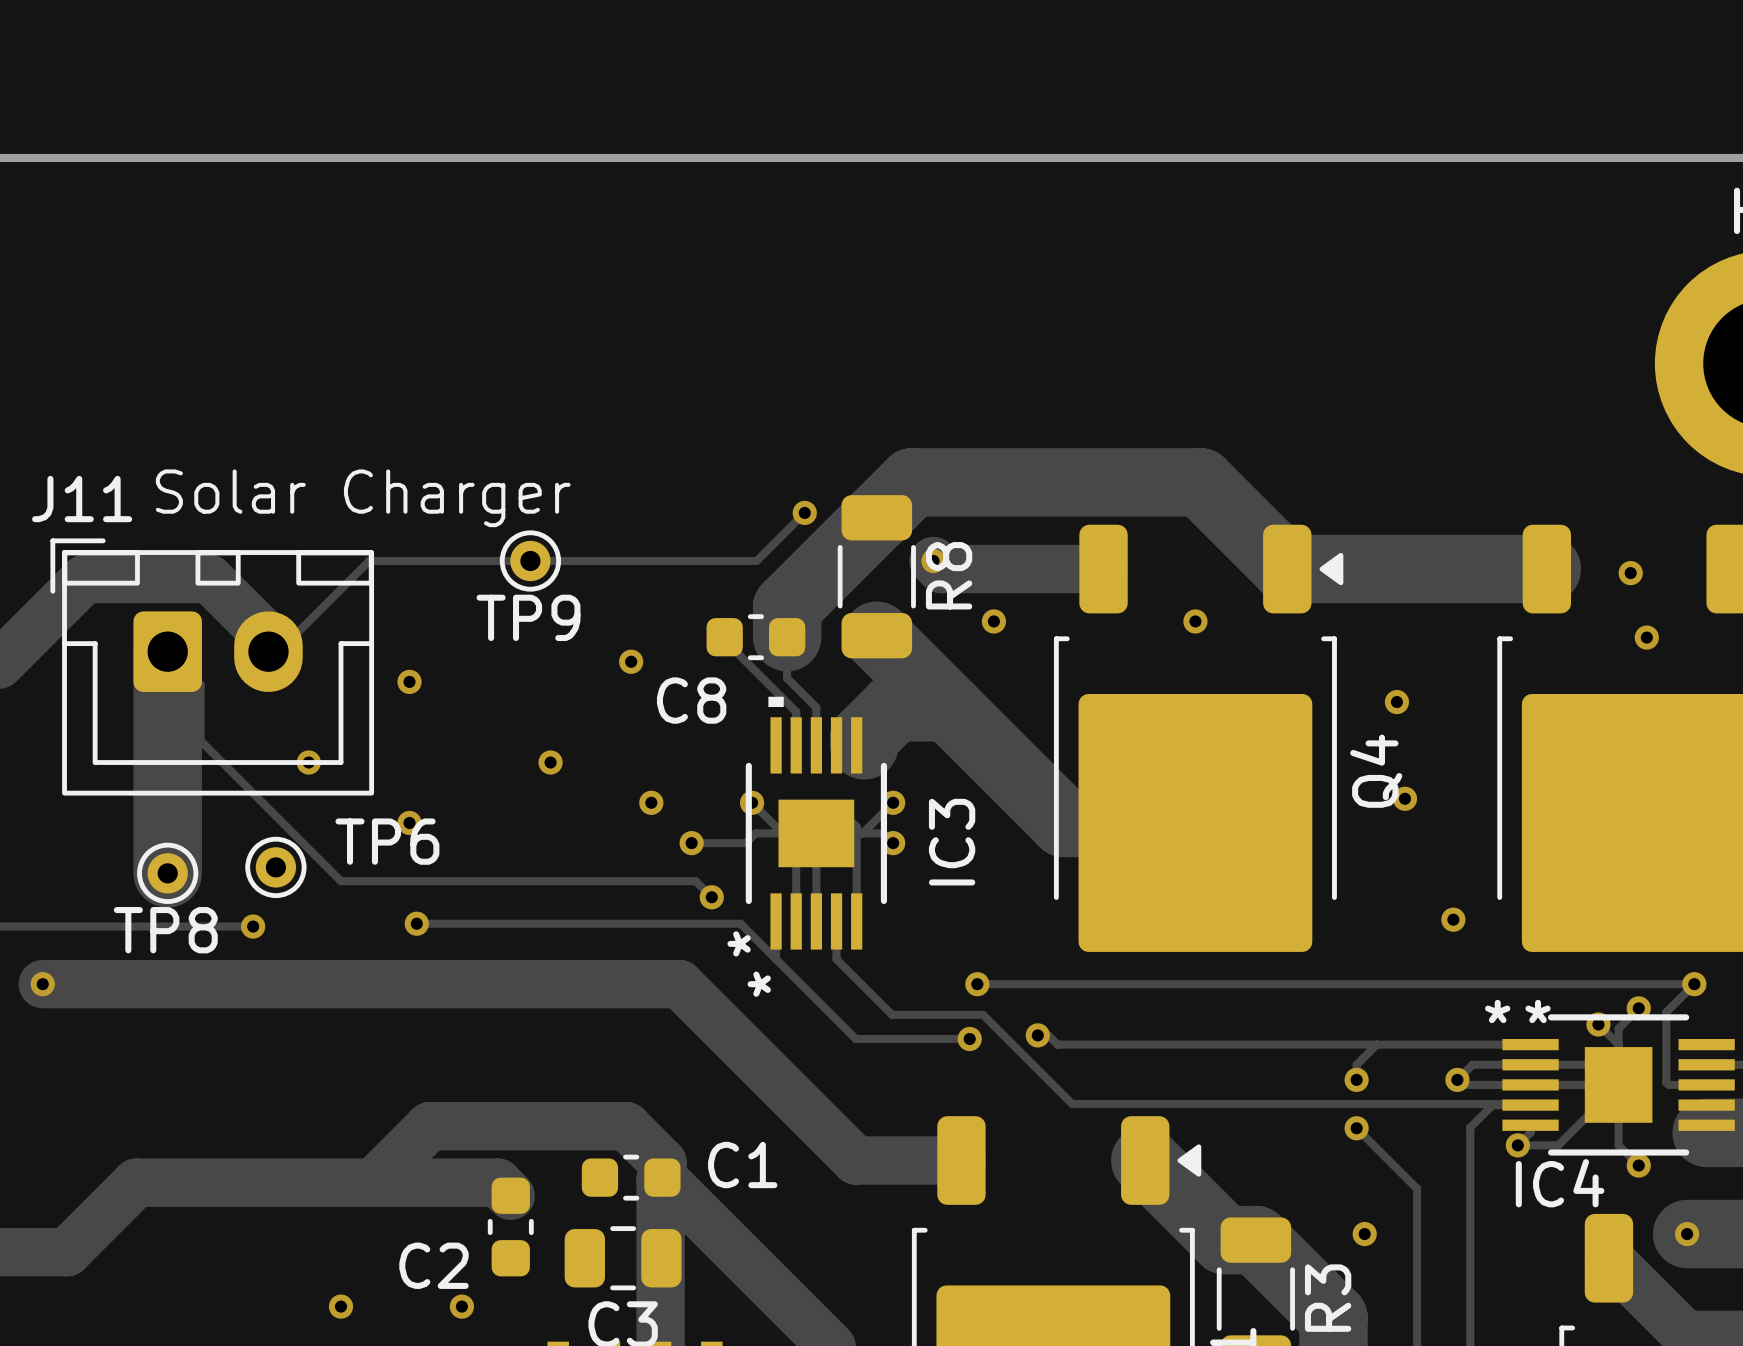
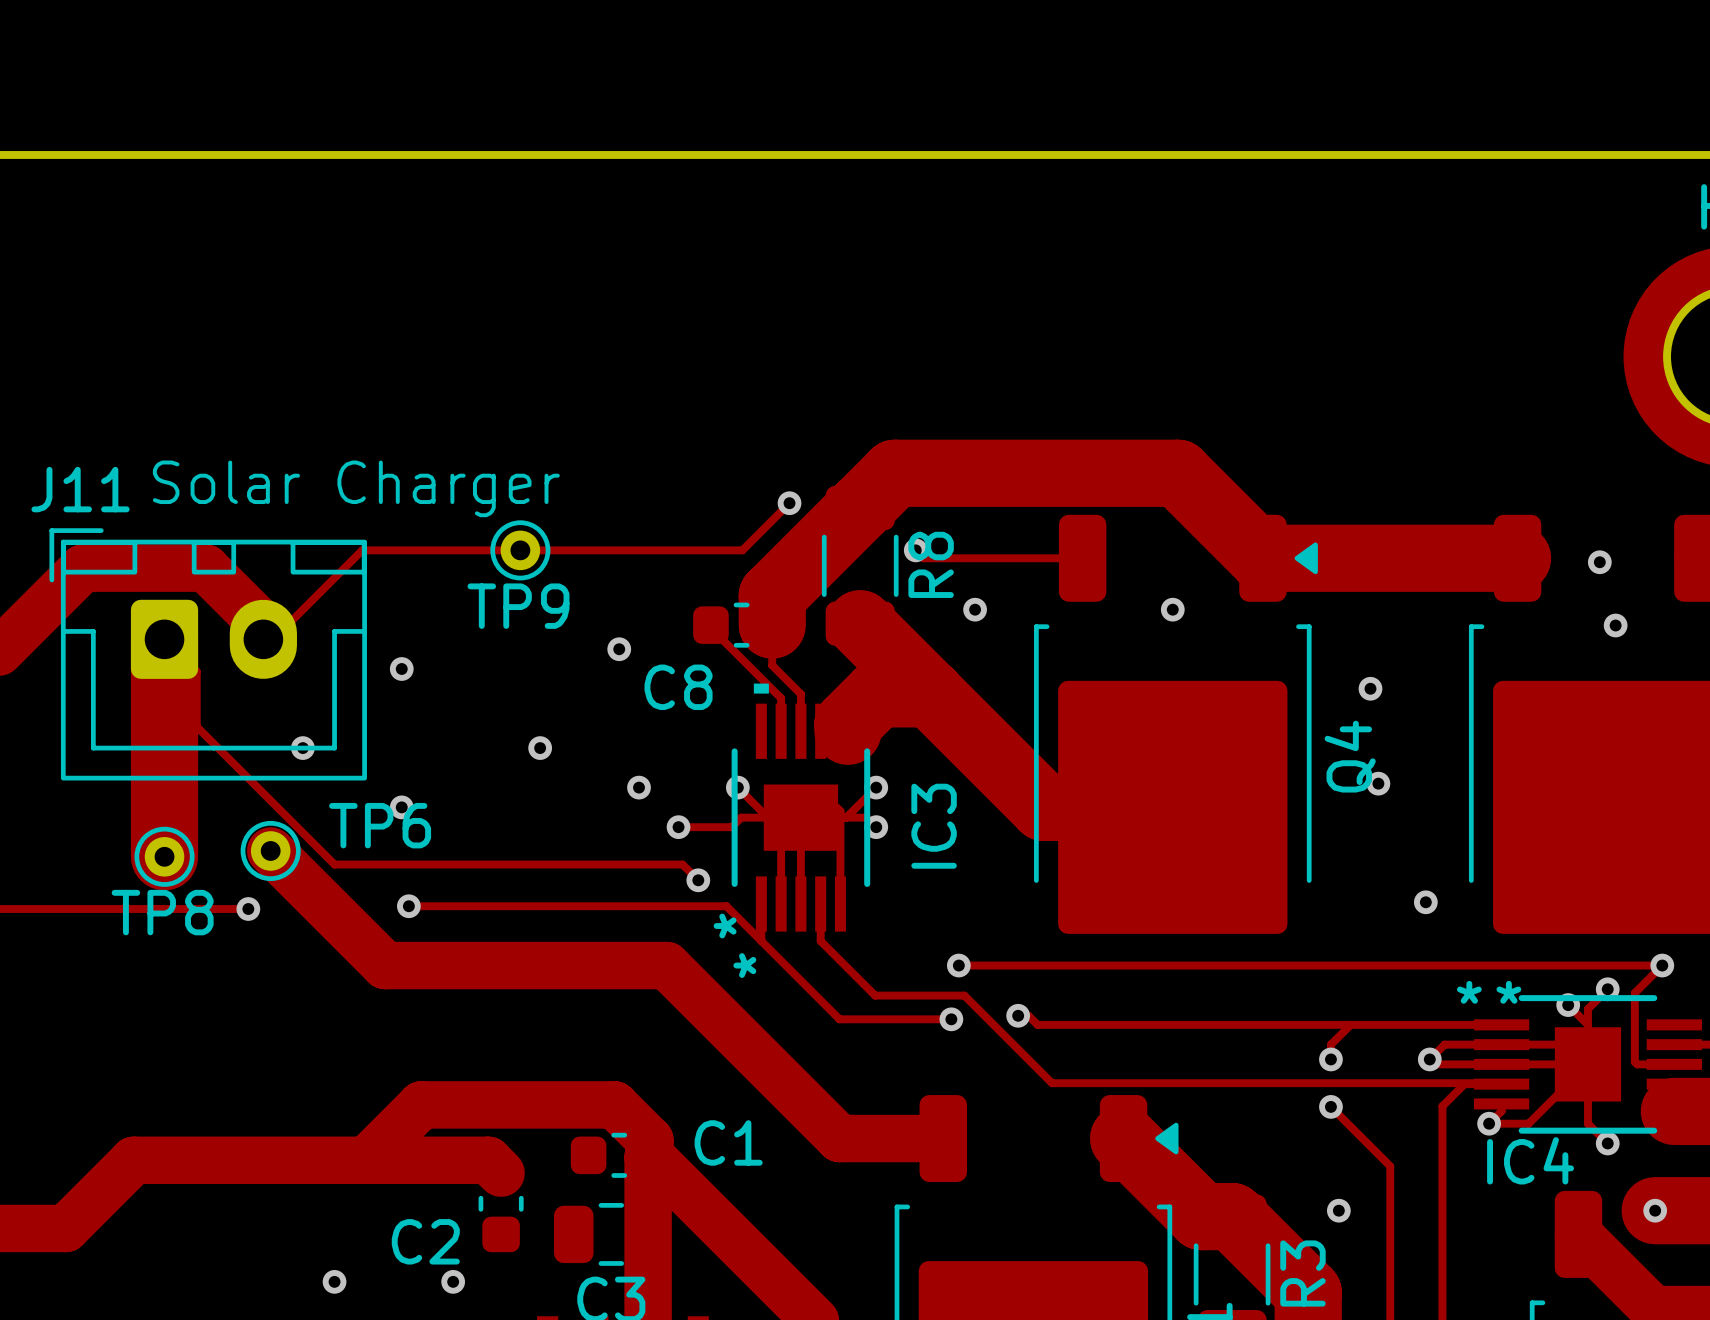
track width: thick (933, 561) (941, 569) (1103, 569) -> thin (915, 550) (923, 558) (1082, 558)
track: (42, 984) (392, 984) -> (270, 850) (385, 965)
via: (42, 984) -> none

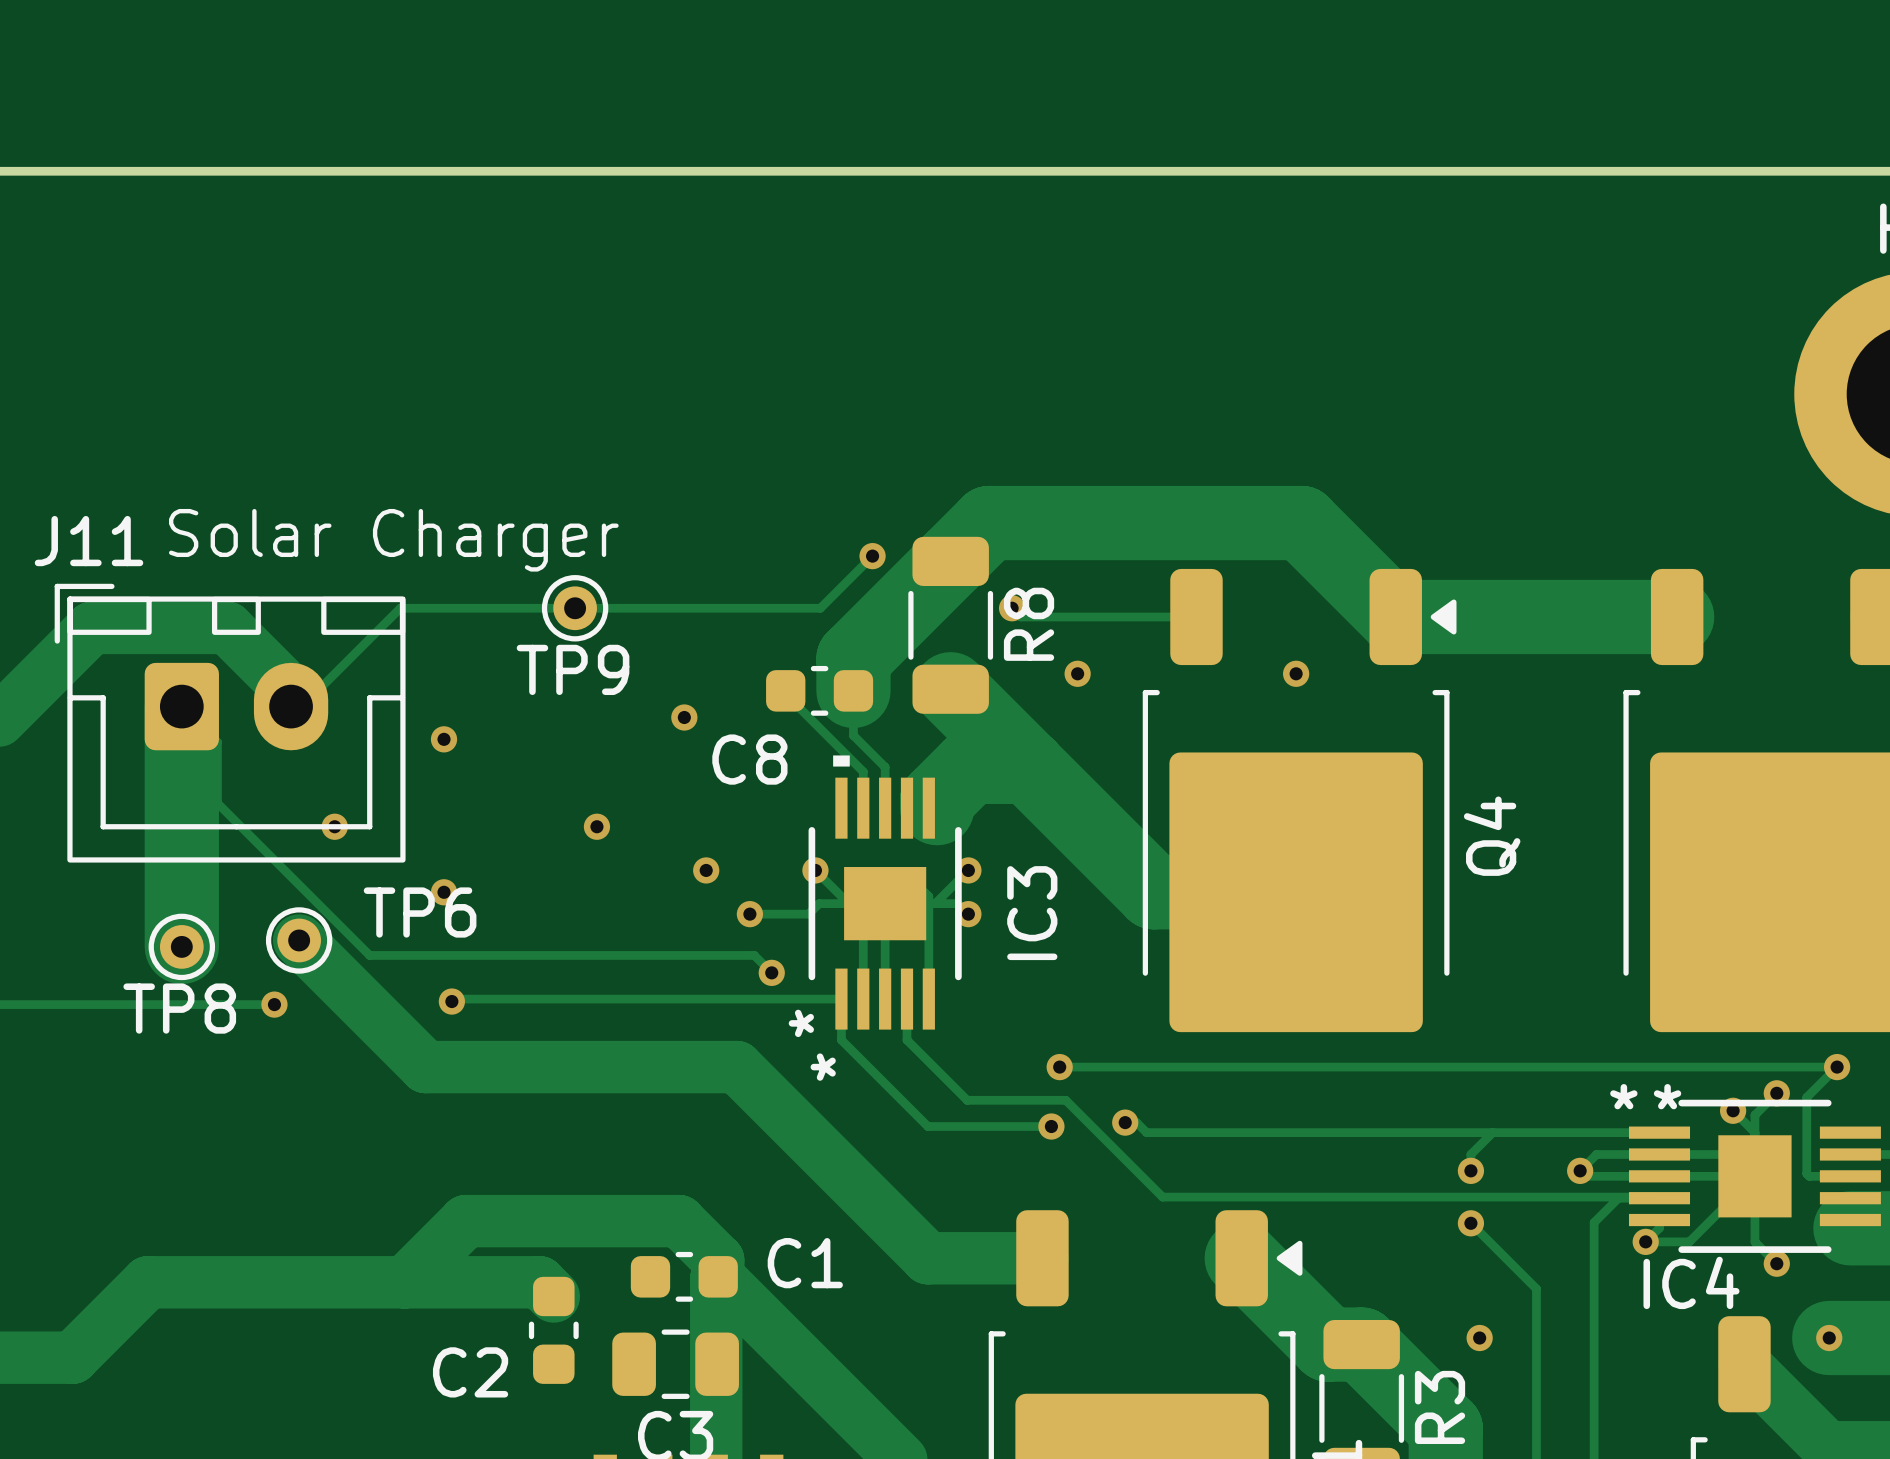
via: (1599, 562) -> none
via: (1615, 625) -> none
via: (1370, 688) -> none
via: (1378, 783) -> none
via: (1425, 902) -> none
track: none -> (454, 999) (841, 999)
track: (408, 906) (726, 906) (761, 941) -> none
via: (334, 1281) -> none
via: (453, 1281) -> none

